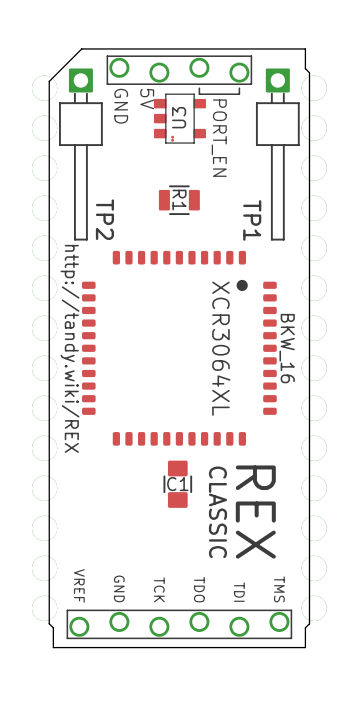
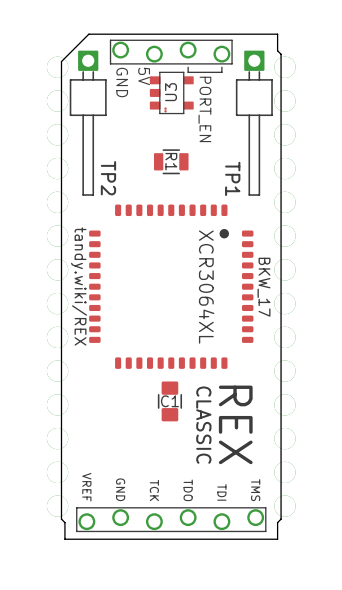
text: http://tandy.wiki/REX (70, 348) -> tandy.wiki/REX (79, 286)
text: BKW_16 (287, 348) -> BKW_17 (263, 287)

